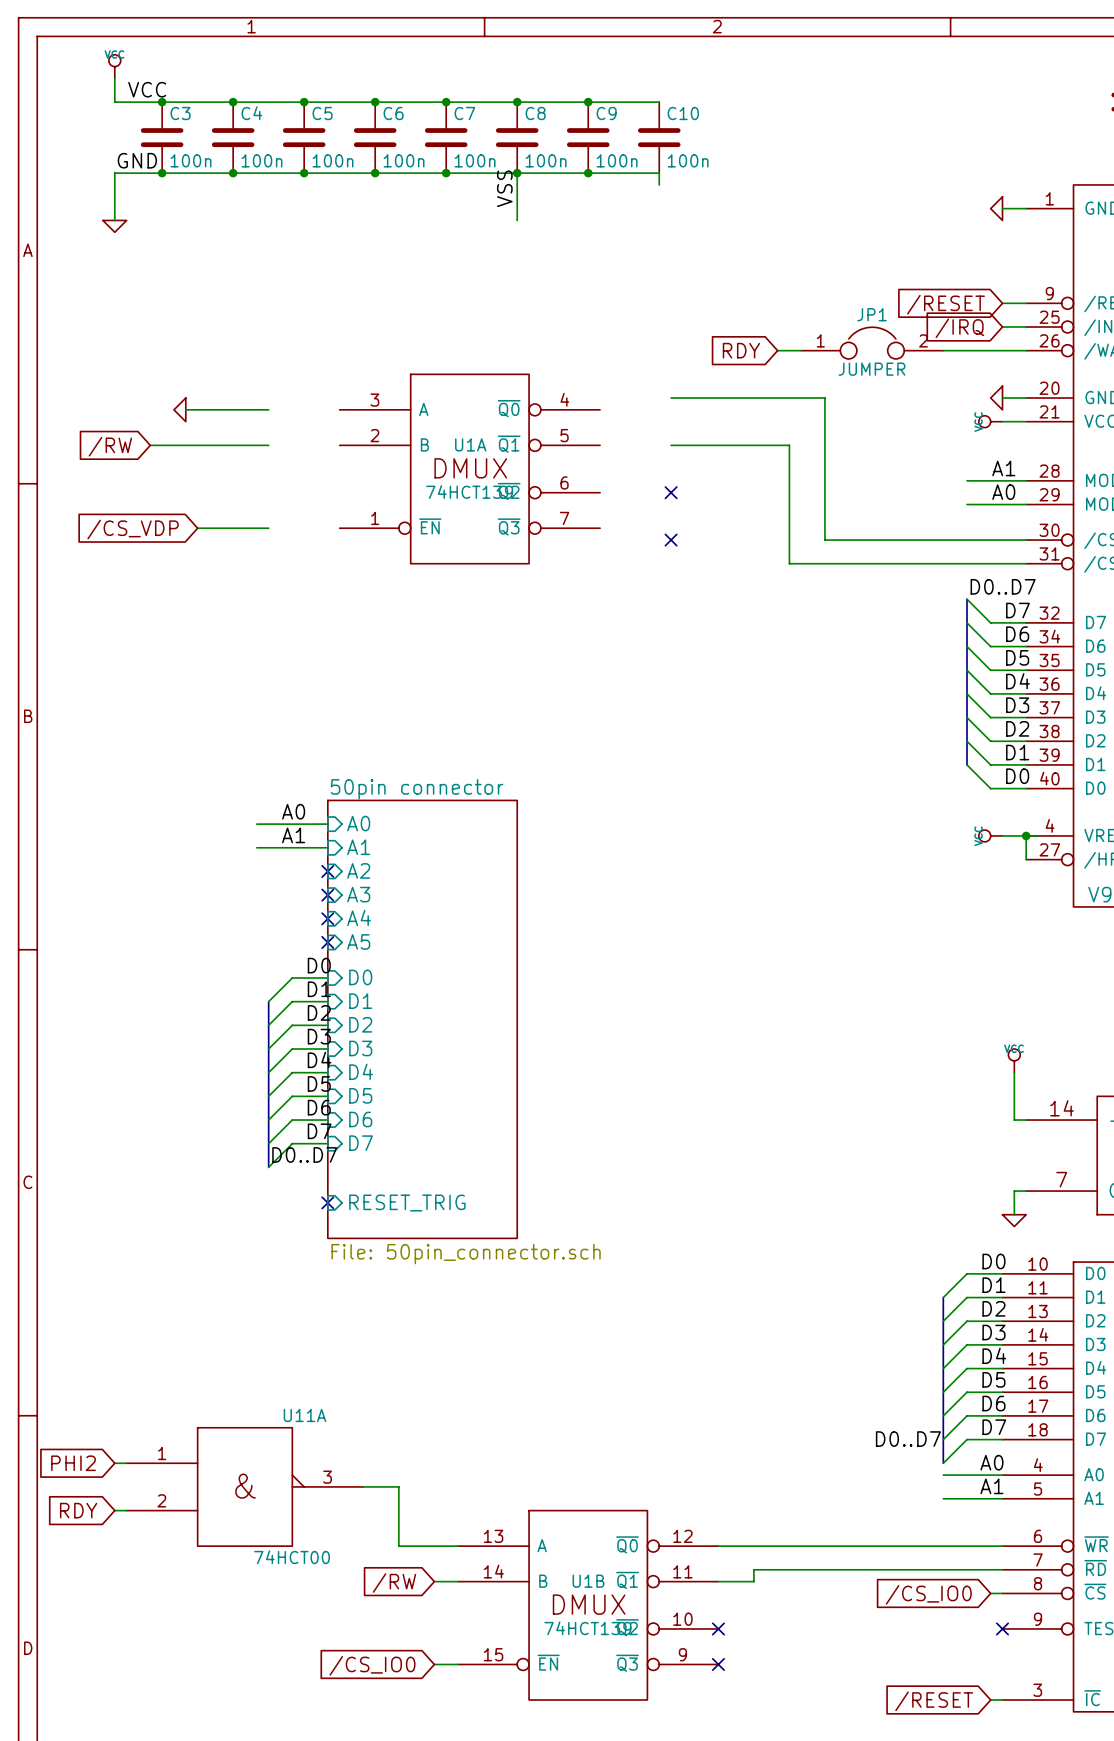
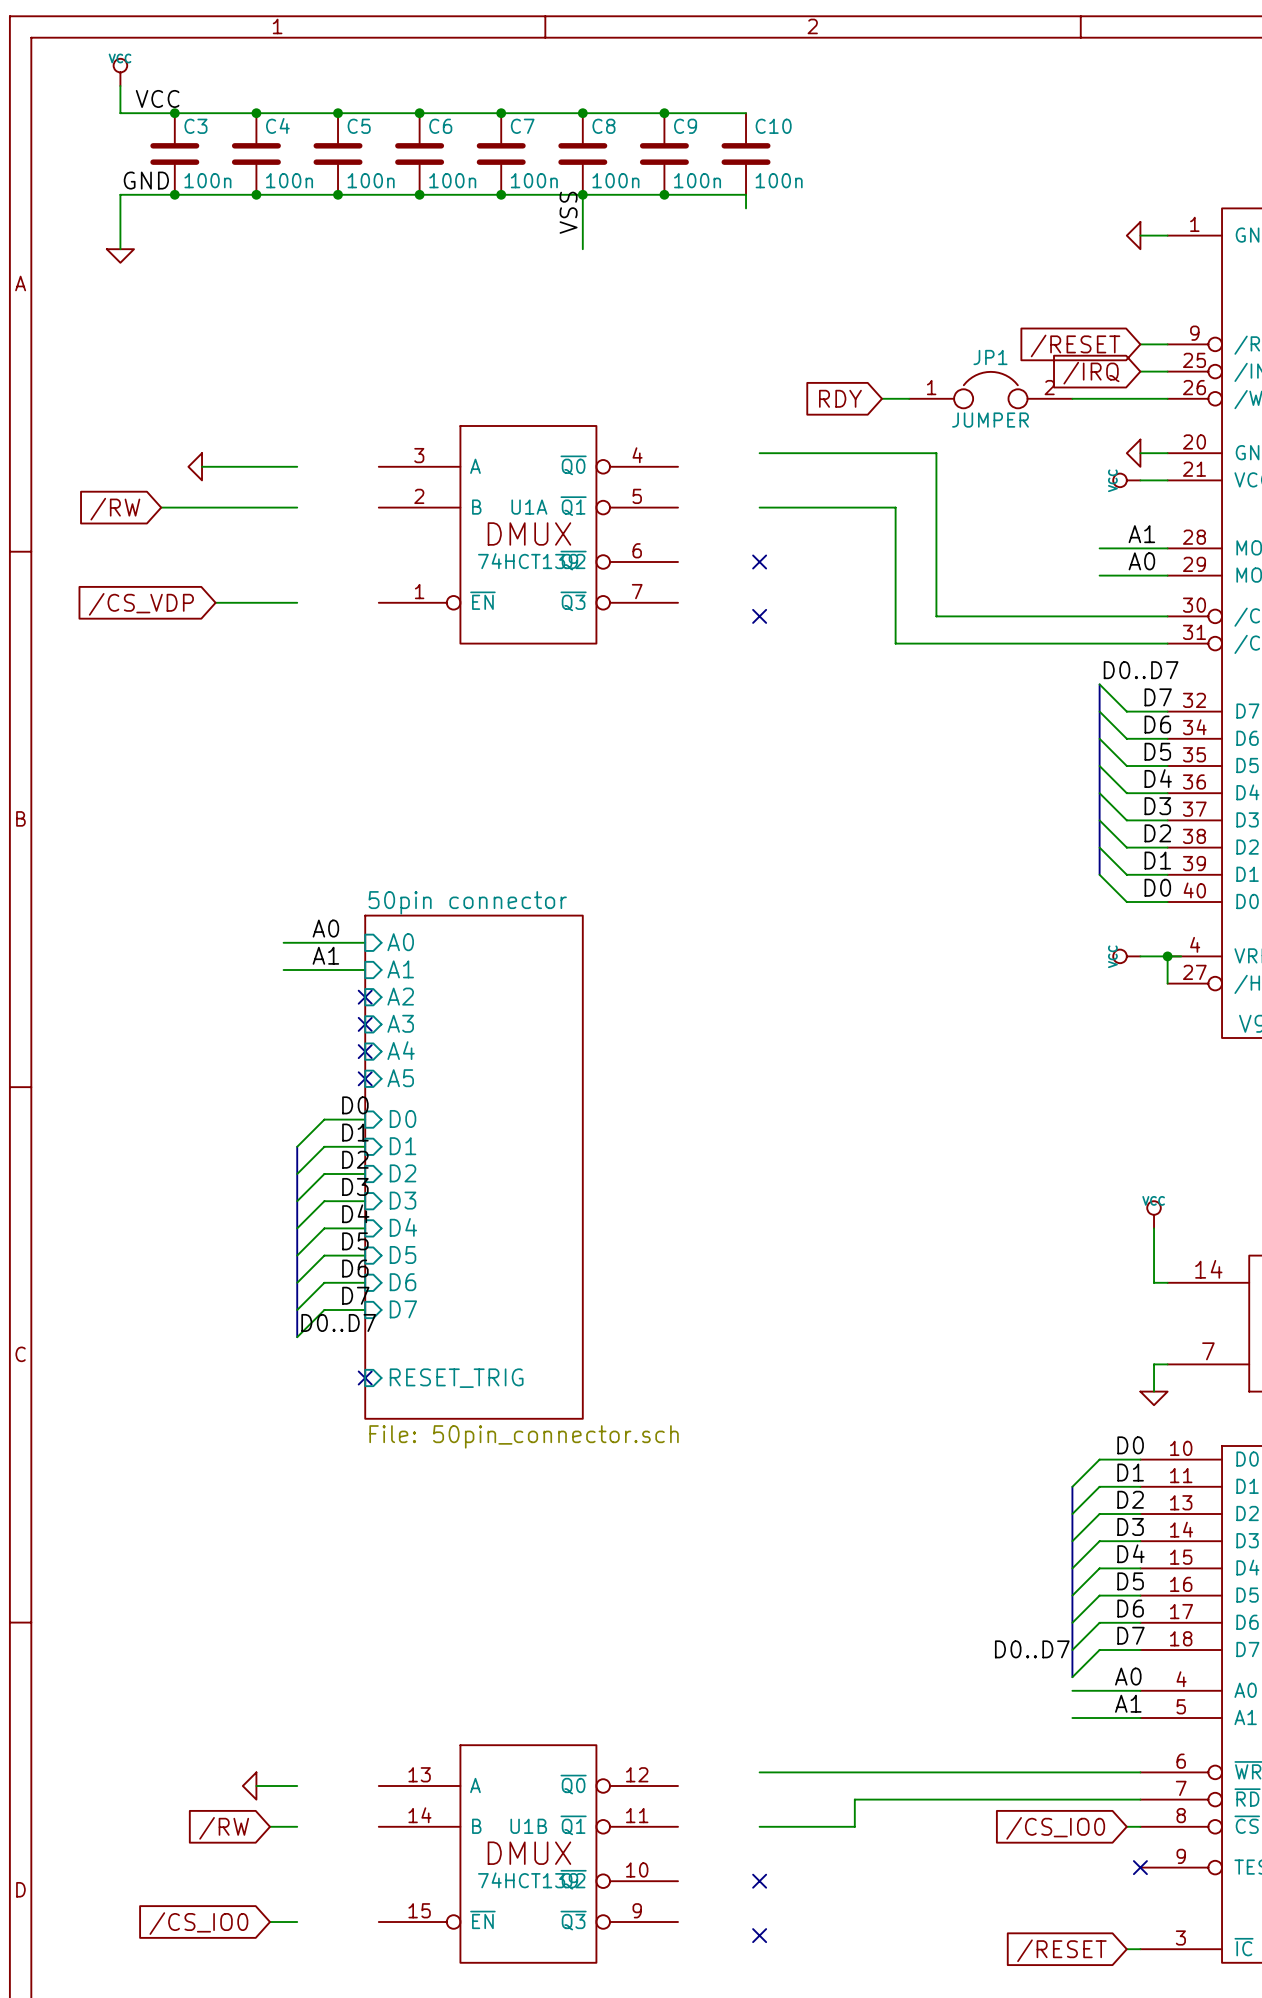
global label: PHI2 (73, 1463) -> none
wire: (114, 1463) (126, 1463) -> none
U11A: 74HCT00 (244, 1486) -> none
wire: (363, 1486) (398, 1486) (398, 1546) (458, 1546) -> none
global label: RDY (78, 1510) -> none
wire: (114, 1510) (126, 1510) -> none
power symbol: none -> (249, 1786)
wire: none -> (256, 1786) (297, 1786)
wire: (434, 1581) (458, 1581) -> (270, 1826) (297, 1826)
wire: (718, 1581) (753, 1581) -> (759, 1826) (854, 1826) (854, 1813)
global label position: /RW (394, 1582) -> /RW (224, 1828)
U1B position: (588, 1605) -> (528, 1854)
no-connect mark: (718, 1628) -> none
no-connect mark: none -> (759, 1881)
wire: (434, 1664) (458, 1664) -> (270, 1922) (297, 1922)
no-connect mark: (718, 1664) -> none
global label position: /CS_IO0 (372, 1665) -> /CS_IO0 (198, 1923)
no-connect mark: none -> (759, 1935)

